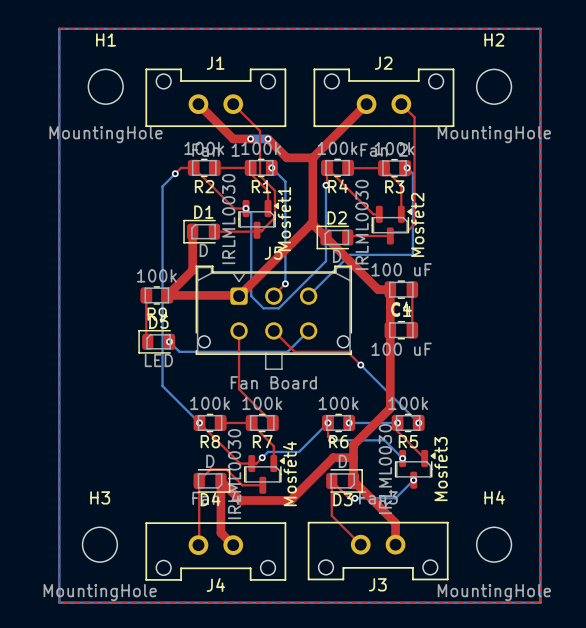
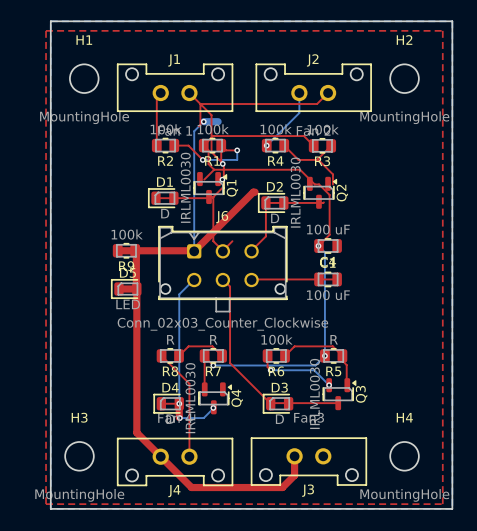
board edge: none -> (50, 21) (452, 21) (452, 508) (50, 508) (50, 21)
bottom track: (59, 28) (540, 28) (540, 602) (59, 602) (59, 28) -> none
top track: (198, 104) (233, 138) (250, 138) -> (160, 93) (156, 96) (156, 145)
bottom track: none -> (299, 93) (299, 112) (266, 145)
top track: (366, 104) (312, 157) -> none
top track: (401, 104) (414, 117) (414, 224) (406, 232) (394, 232) (390, 236) (347, 237) -> (328, 93) (317, 104) (200, 104) (198, 126)
top track: (268, 138) (286, 157) (312, 157) -> none
via: (268, 138) -> none
bottom track: none -> (198, 126) (194, 131) (194, 250)
top track: (312, 157) (312, 224) (378, 289) (390, 289) (390, 408) (353, 445) (353, 480) (395, 522) (395, 544) -> none
top track: (232, 167) (250, 167) (250, 173) (268, 191) (268, 208) -> (188, 145) (202, 159)
bottom track: (271, 167) (285, 181) (285, 283) -> none
via: (271, 167) -> none
bottom track: (407, 167) (412, 173) (412, 254) (349, 254) (308, 296) -> none
via: (407, 167) -> none
top track: (348, 168) (383, 168) (401, 185) (401, 214) -> (284, 145) (298, 159) (317, 159) (331, 145)
top track: none -> (313, 145) (303, 136) (213, 136) (203, 145) (208, 150) (208, 164) (214, 169)
bottom track: (175, 173) (162, 186) (162, 386) (199, 422) -> none
top track: (175, 173) (181, 167) (193, 167) (234, 208) (246, 208) -> none
via: (175, 173) -> none
bottom track: none -> (237, 150) (237, 159) (202, 159)
top track: none -> (237, 150) (226, 150) (221, 145) (222, 163)
via: none -> (237, 150)
top track: none -> (317, 159) (332, 174) (332, 184)
via: none -> (202, 159)
bottom track: (325, 185) (325, 261) (278, 308) (263, 308) (251, 296) (251, 213) (246, 208) -> none
top track: (325, 185) (327, 167) (373, 214) (379, 214) -> none
via position: (325, 185) -> (266, 145)
via: none -> (222, 163)
top track: none -> (214, 169) (300, 169) (314, 184) (319, 184) (329, 194) (329, 234) (318, 245)
top track: none -> (214, 169) (204, 179)
via: (246, 208) -> none
via: none -> (222, 179)
Mosfet1 name: Mosfet1 (284, 219) -> Q1 (232, 188)
Mosfet2 name: Mosfet2 (417, 224) -> Q2 (342, 193)
top track: none -> (213, 197) (213, 241) (222, 250)
top track: (192, 231) (192, 270) (167, 295) -> (118, 250) (135, 250)
top track: none -> (155, 198) (173, 198)
top track: none -> (323, 202) (265, 202) (265, 236) (251, 250)
J5 name: J5 (273, 253) -> J6 (222, 217)
via: (285, 283) -> none
bottom track: none -> (318, 245) (324, 252) (324, 355) (315, 365) (213, 365)
via: none -> (318, 245)
top track: (412, 289) (412, 330) -> (251, 279) (337, 279)
top track: (146, 295) (147, 341) -> none
top track: none -> (136, 250) (136, 288)
bottom track: none -> (194, 279) (179, 294) (179, 403)
top track: (239, 330) (239, 389) (261, 411) -> none
top track: (273, 330) (294, 351) (347, 351) (360, 365) -> none
top track: none -> (222, 279) (230, 286) (230, 363) (270, 403) (337, 403)
bottom track: (308, 330) (287, 351) (179, 351) (169, 341) -> none
via: (169, 341) -> none
bottom track: (360, 365) (418, 422) -> none
via: (360, 365) -> none
J5 value: Fan Board (273, 382) -> Conn_02x03_Counter_Clockwise (222, 324)
R8 value: 100k (210, 403) -> R (170, 339)
R7 value: 100k (262, 403) -> R (213, 339)
R5 value: 100k (408, 403) -> R (334, 339)
via: (199, 422) -> none
top track: (220, 422) (251, 422) -> (179, 355) (188, 346) (212, 346)
bottom track: (328, 422) (299, 451) (268, 451) (262, 457) -> none
via: (328, 422) -> none
bottom track: (349, 422) (397, 422) -> none
top track: none -> (285, 355) (294, 346) (332, 346) (342, 355) (342, 360) (346, 365) (346, 385)
via: (349, 422) -> none
top track: (397, 422) (397, 431) (424, 458) -> none
via: (418, 422) -> none
top track: none -> (204, 356) (204, 389)
top track: (262, 434) (273, 446) (273, 463) -> none
via: none -> (213, 365)
top track: (233, 456) (240, 463) (256, 463) (262, 457) -> none
via: (262, 457) -> none
top track: (353, 457) (333, 457) (290, 500) (240, 500) (220, 480) -> (161, 403) (179, 403)
Mosfet3 name: Mosfet3 (441, 469) -> Q3 (361, 394)
Mosfet4 name: Mosfet4 (289, 473) -> Q4 (237, 398)
D4 rotation: 0° (211, 480) -> 180° (168, 403)
via: none -> (179, 403)
D3 rotation: 0° (344, 480) -> 180° (278, 403)
bottom track: (413, 480) (395, 498) (354, 498) -> none
via: (413, 480) -> none
bottom track: none -> (213, 407) (203, 418) (179, 418)
top track: (262, 485) (242, 485) (226, 469) (210, 469) (199, 480) (198, 545) -> none
via: none -> (213, 407)
top track: (220, 497) (220, 532) (233, 545) -> (189, 383) (189, 456)
via: none -> (179, 418)
top track: (354, 498) (349, 498) (331, 480) (331, 515) (360, 544) -> (118, 289) (136, 289) (136, 432) (191, 487) (282, 487) (294, 475) (294, 456)
via: (354, 498) -> none

